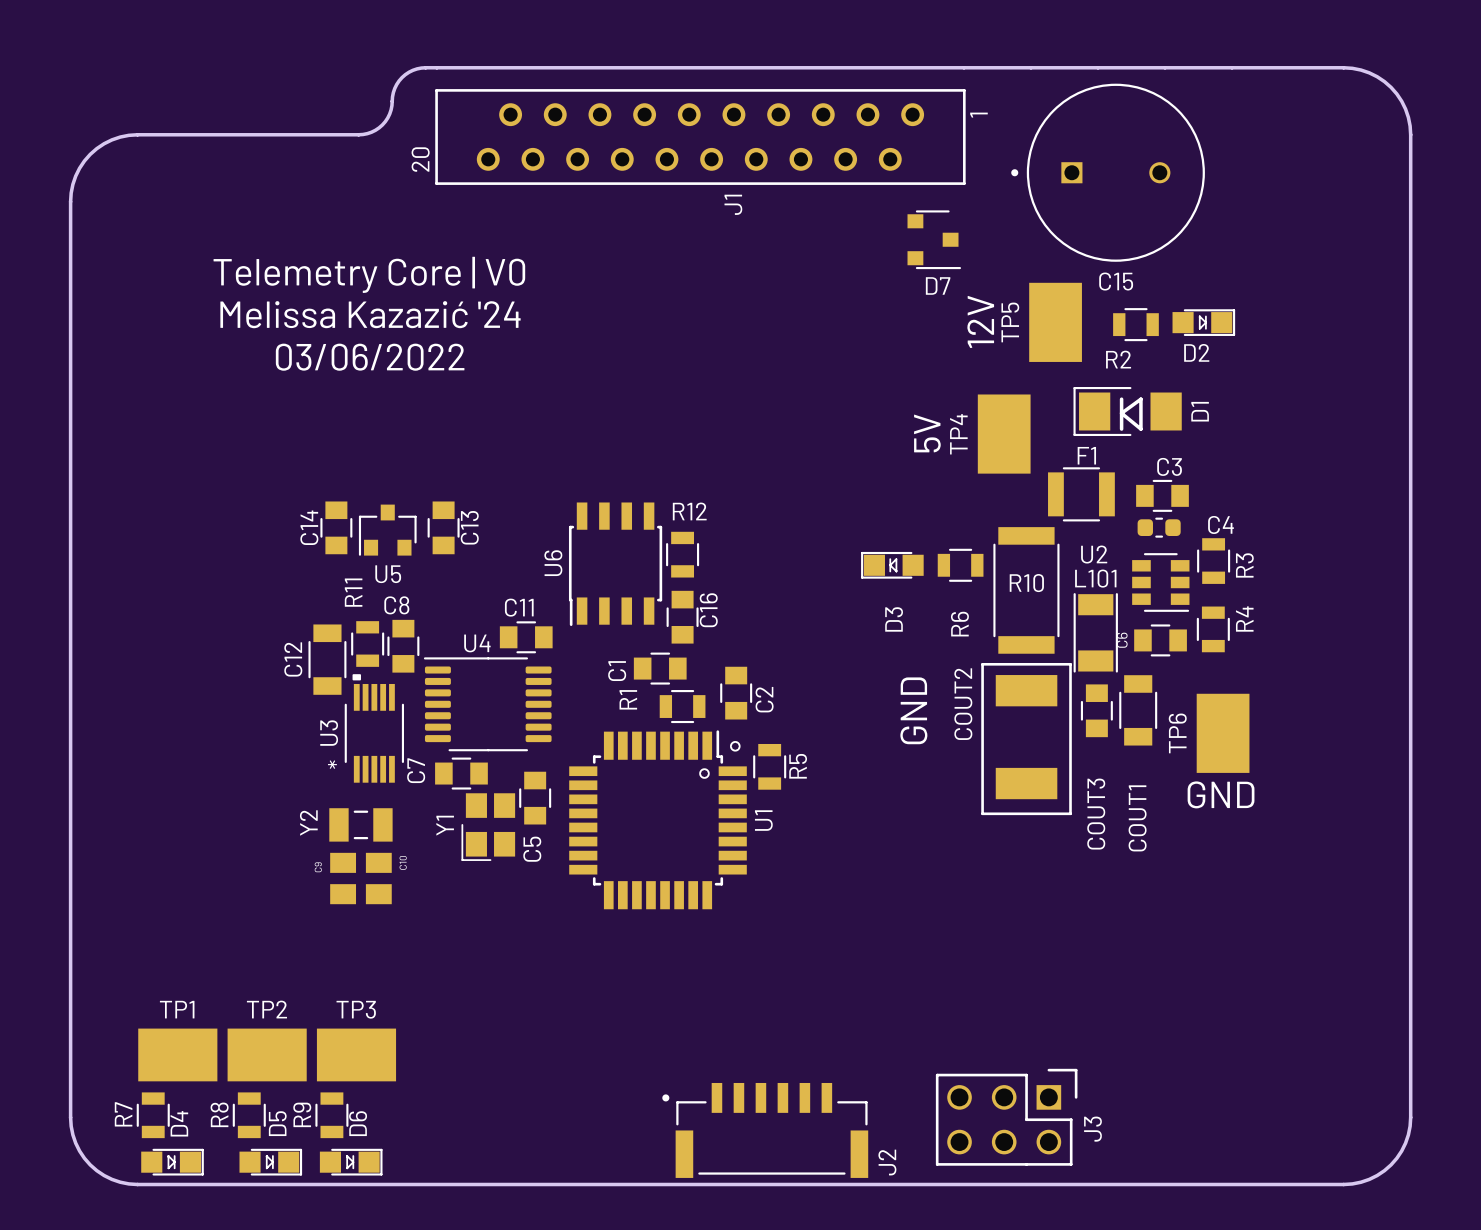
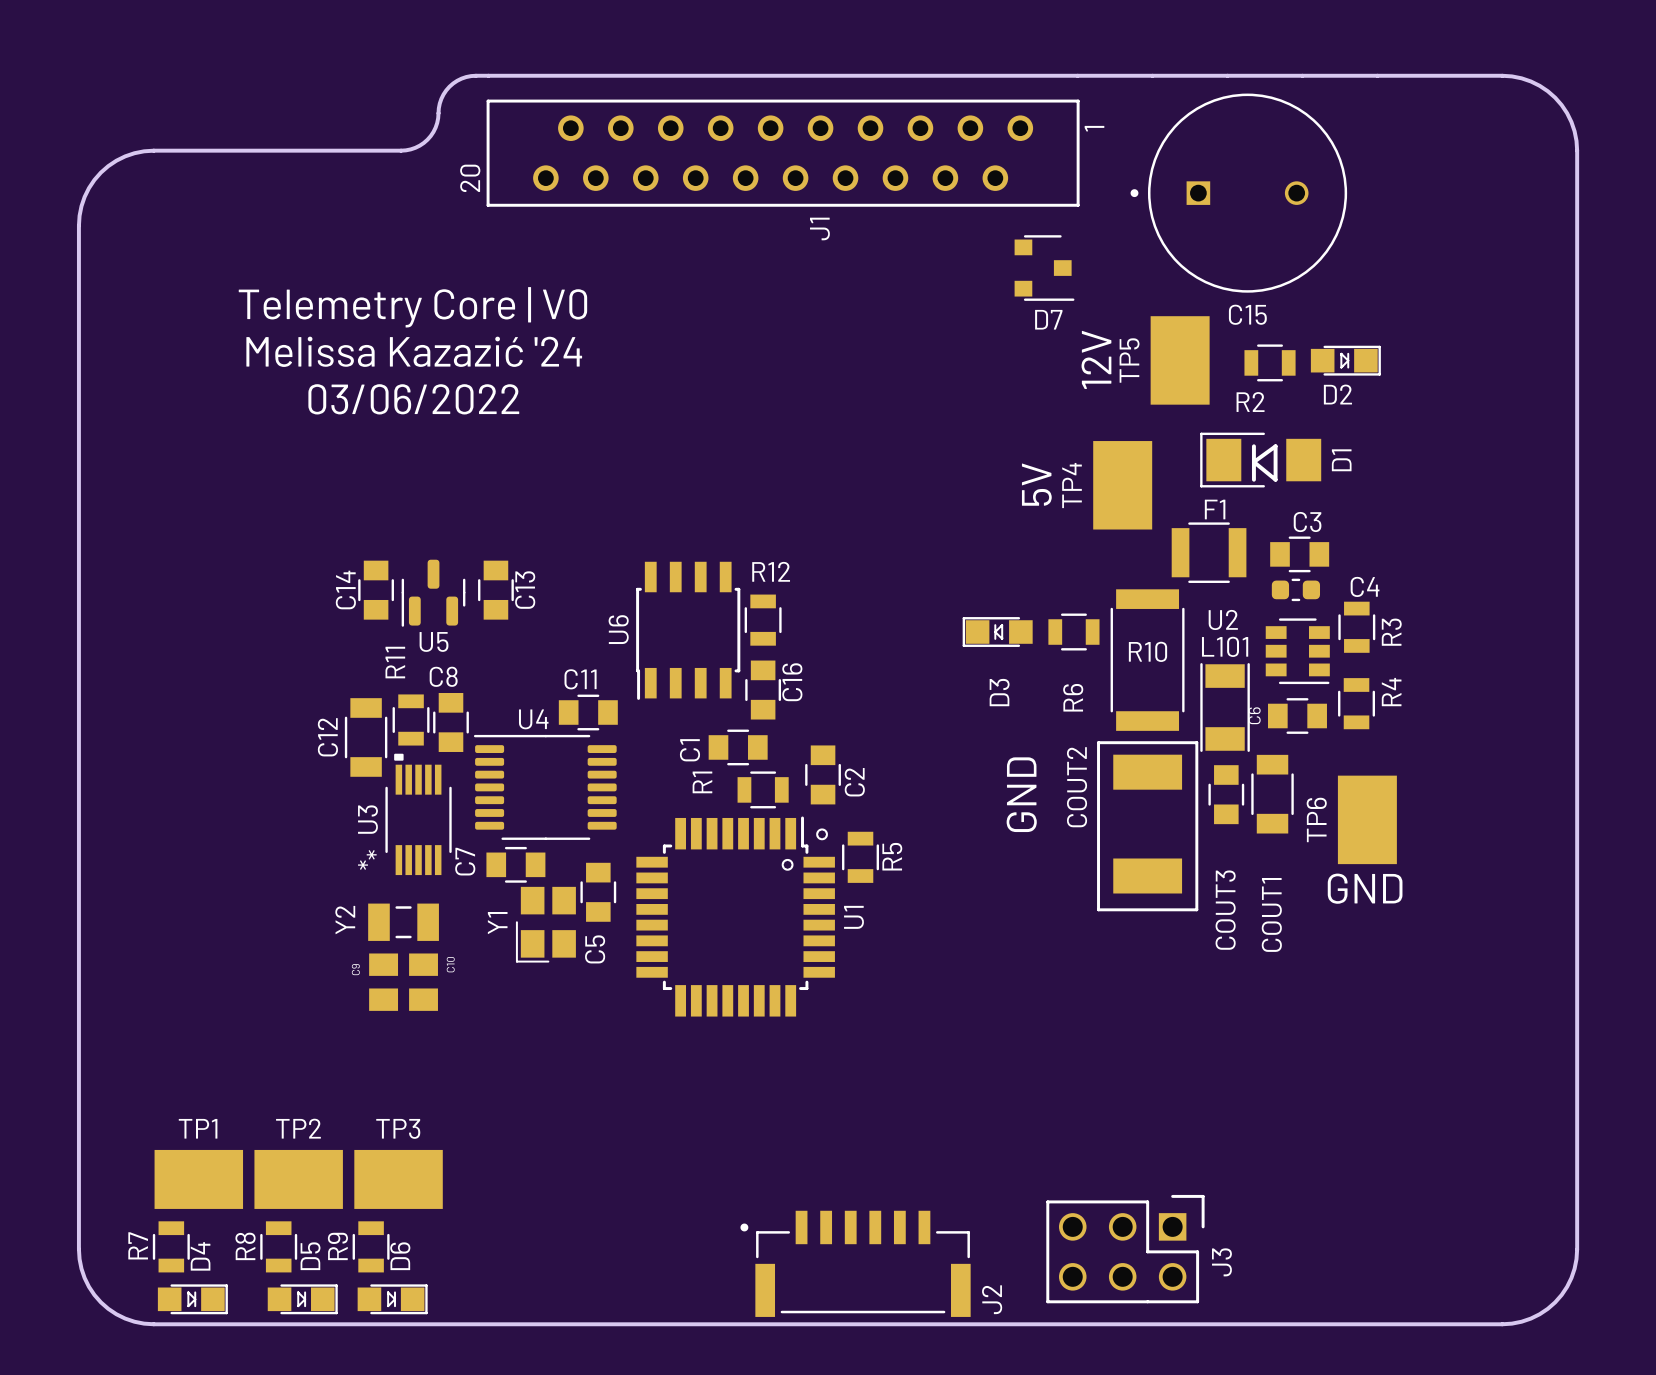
U5 footprint: [358, 504, 417, 556] -> [401, 559, 466, 627]
U3 text: none -> * (362, 865)

